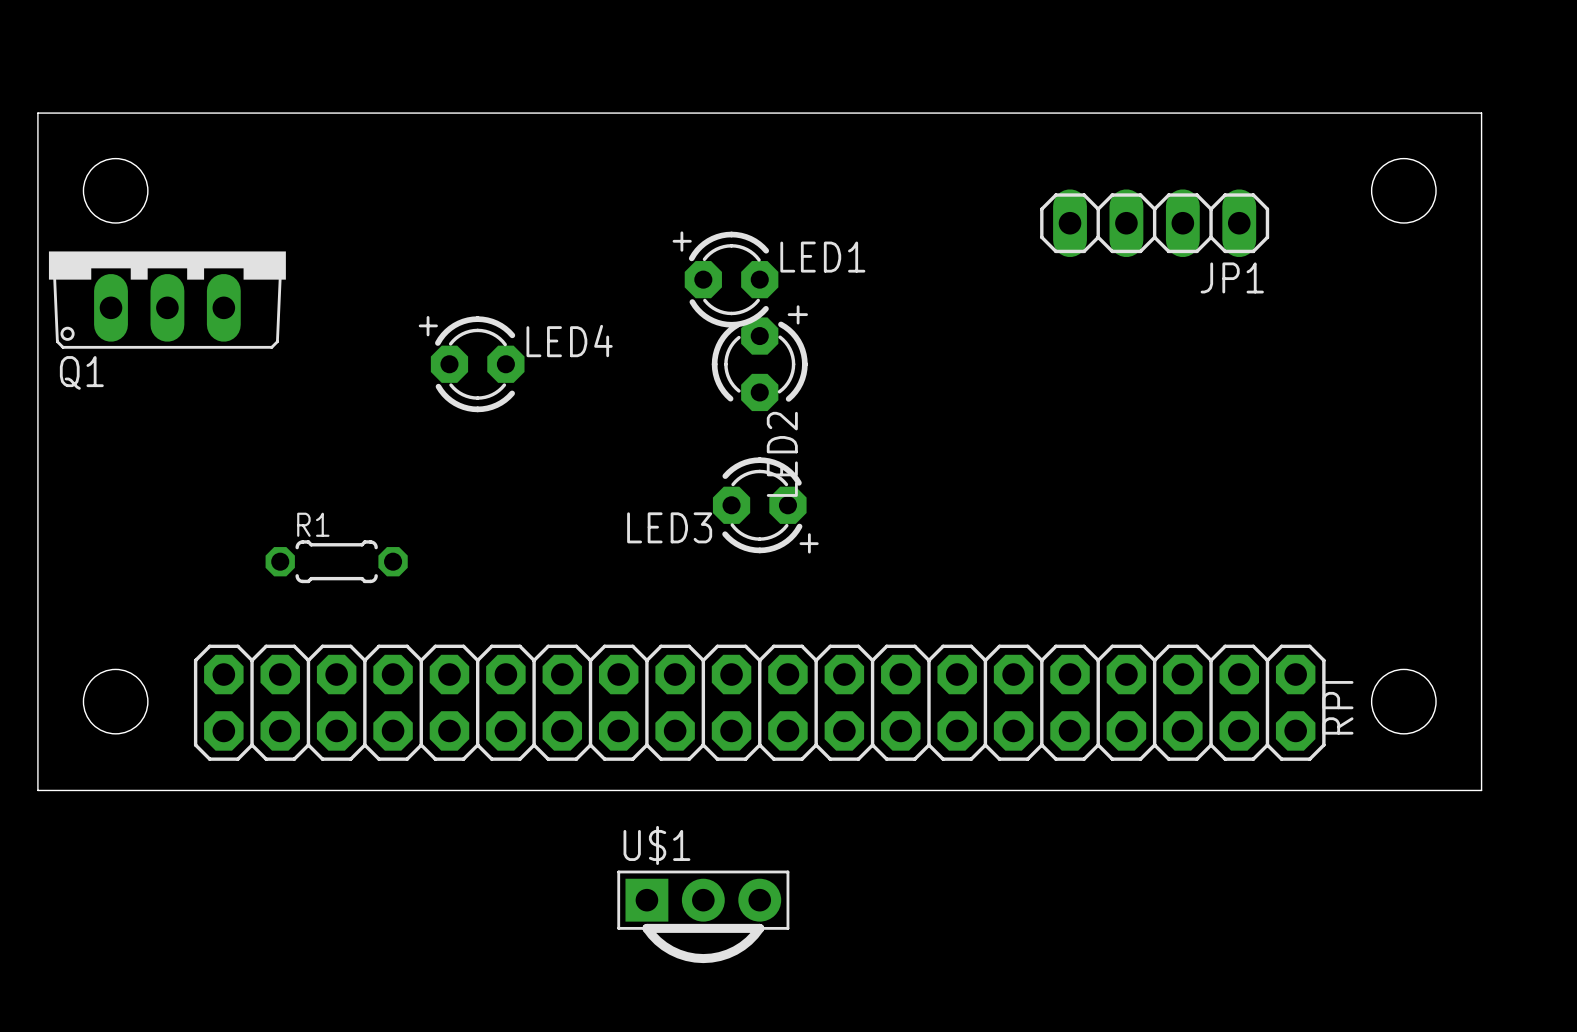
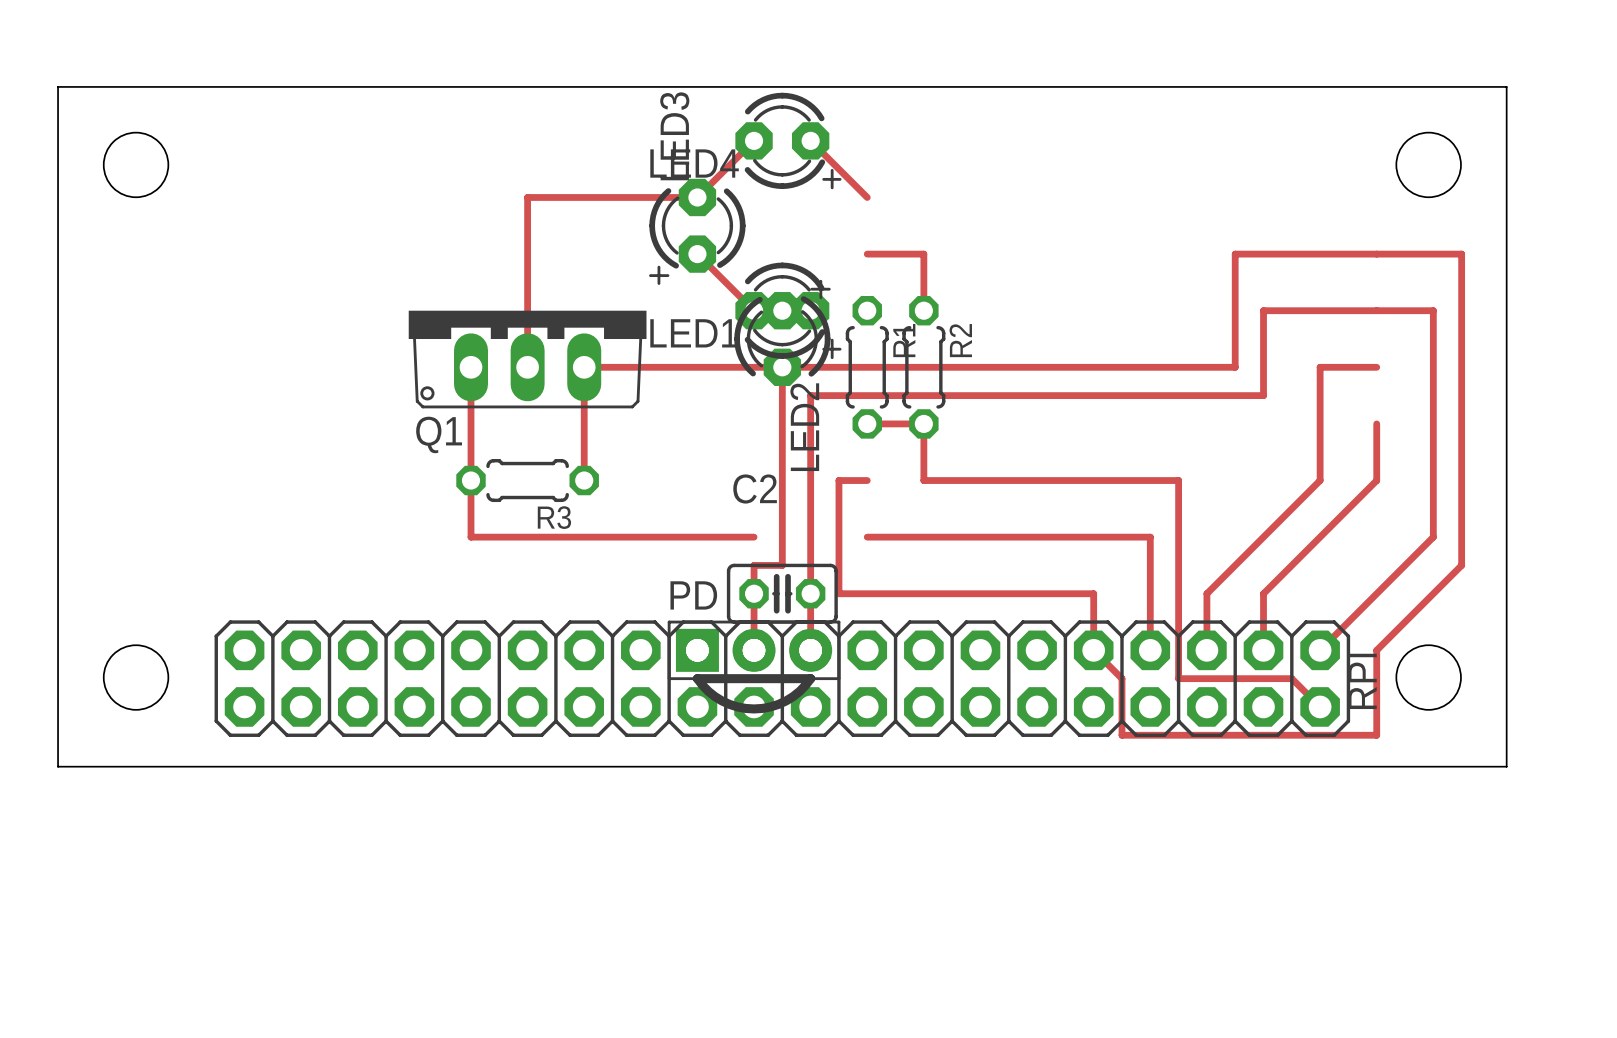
track: none -> (754, 140) (697, 197) (527, 197) (527, 367)
track: none -> (810, 140) (867, 197)
JP1: (1154, 223) -> none
track: none -> (697, 254) (754, 310)
LED1 rotation: 0° (725, 279) -> 180° (788, 310)
LED1 position: (725, 279) -> (788, 310)
track: none -> (867, 254) (923, 254) (923, 310)
Q1 position: (167, 300) -> (527, 359)
LED4 rotation: 0° (471, 364) -> 180° (788, 141)
LED4 position: (471, 364) -> (788, 141)
track: none -> (471, 367) (471, 537) (754, 537)
track: none -> (782, 367) (782, 565) (754, 565) (754, 650)
R2: none -> (923, 367)
track: none -> (1376, 367) (1320, 367) (1320, 480) (1206, 593) (1206, 650)
track: none -> (867, 423) (923, 423) (923, 480) (1178, 480) (1178, 678) (1291, 678) (1320, 706)
track: none -> (1376, 423) (1376, 480) (1263, 593) (1263, 650)
R3: none -> (527, 480)
track: none -> (584, 480) (584, 367) (1235, 367) (1235, 254) (1461, 254) (1461, 565) (1376, 650) (1376, 735) (1121, 735) (1121, 678) (1093, 650) (1093, 593) (838, 593) (838, 480) (867, 480)
LED3 rotation: 0° (765, 505) -> 90° clockwise (697, 231)
LED3 position: (765, 505) -> (697, 231)
R1 rotation: 0° (336, 561) -> 90° clockwise (867, 367)
R1 position: (336, 561) -> (867, 367)
track: none -> (867, 537) (1150, 537) (1150, 650)
C2: none -> (782, 593)
track: none -> (810, 650) (810, 395) (1263, 395) (1263, 310) (1433, 310) (1433, 537) (1320, 650)
PD: none -> (754, 667)
U$1: (703, 916) -> none

